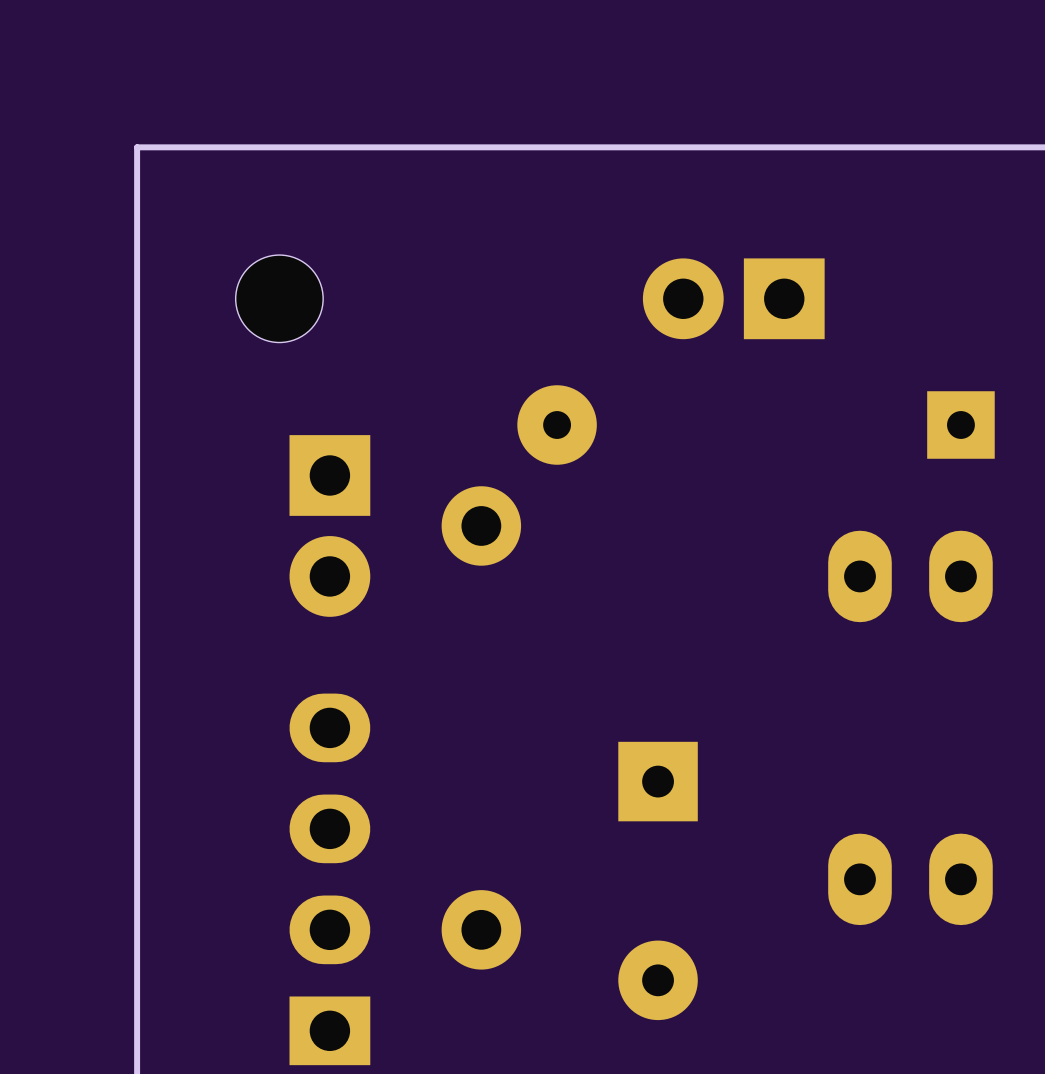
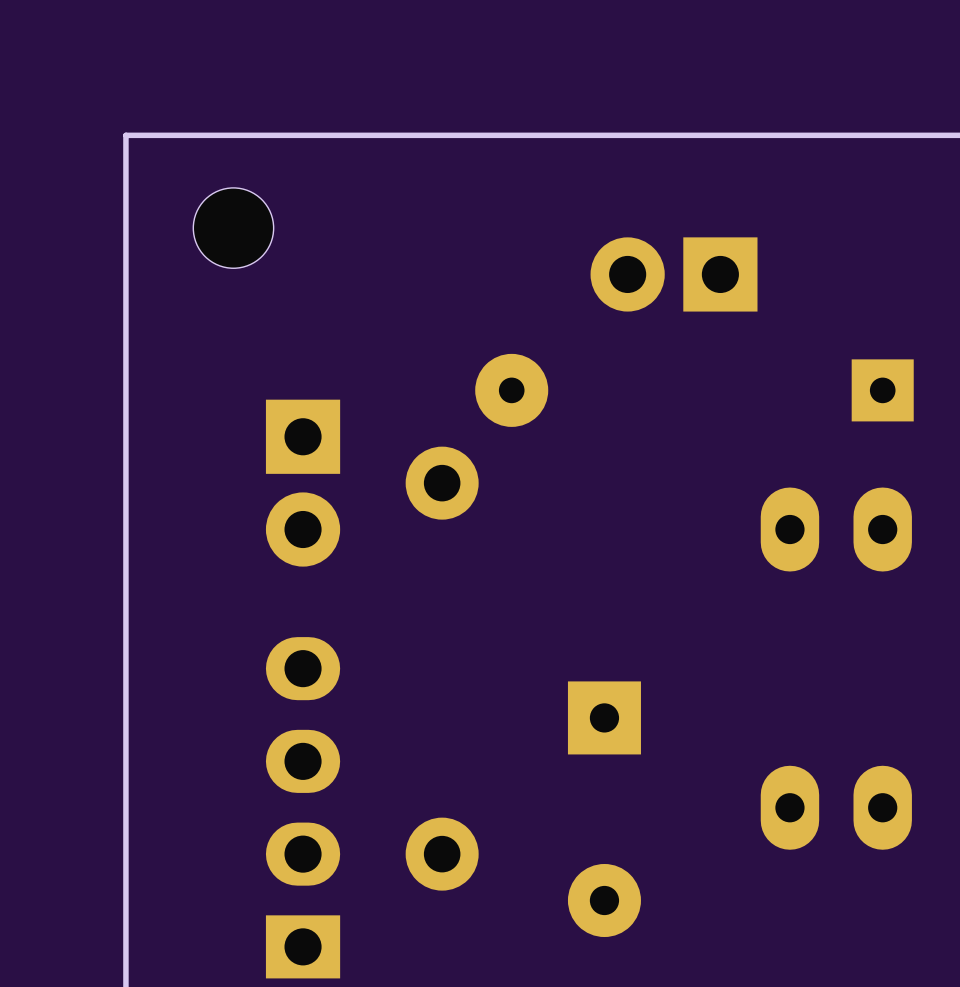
part position: (279, 298) -> (233, 228)

